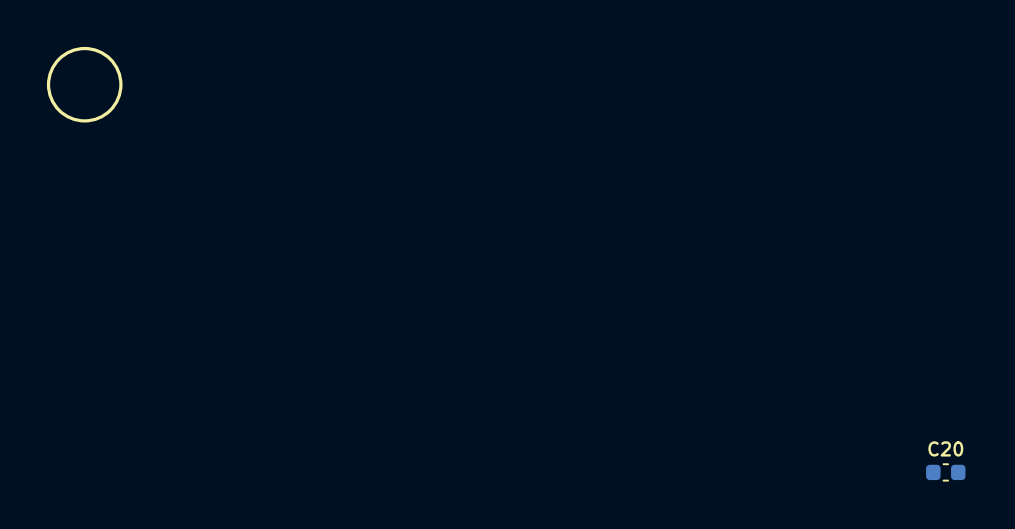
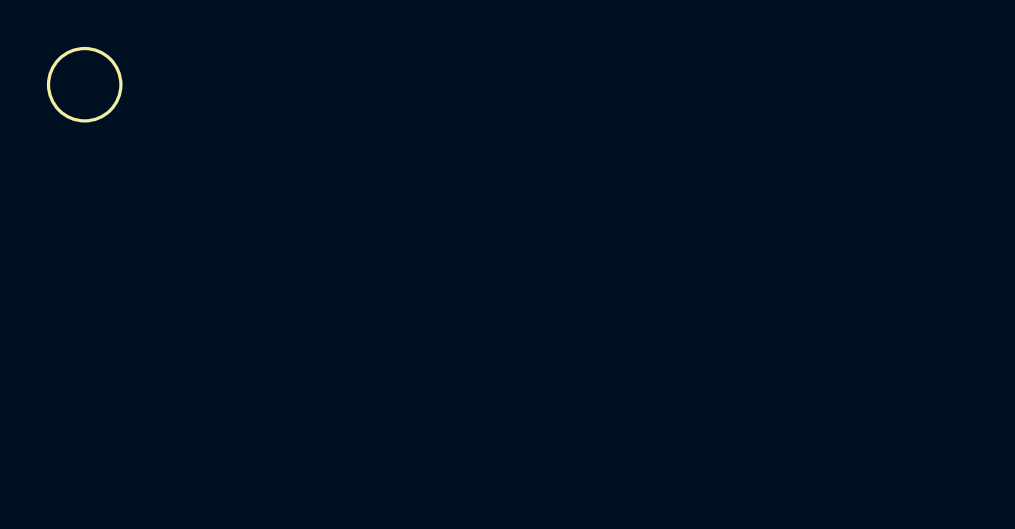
C20: (945, 472) -> none

